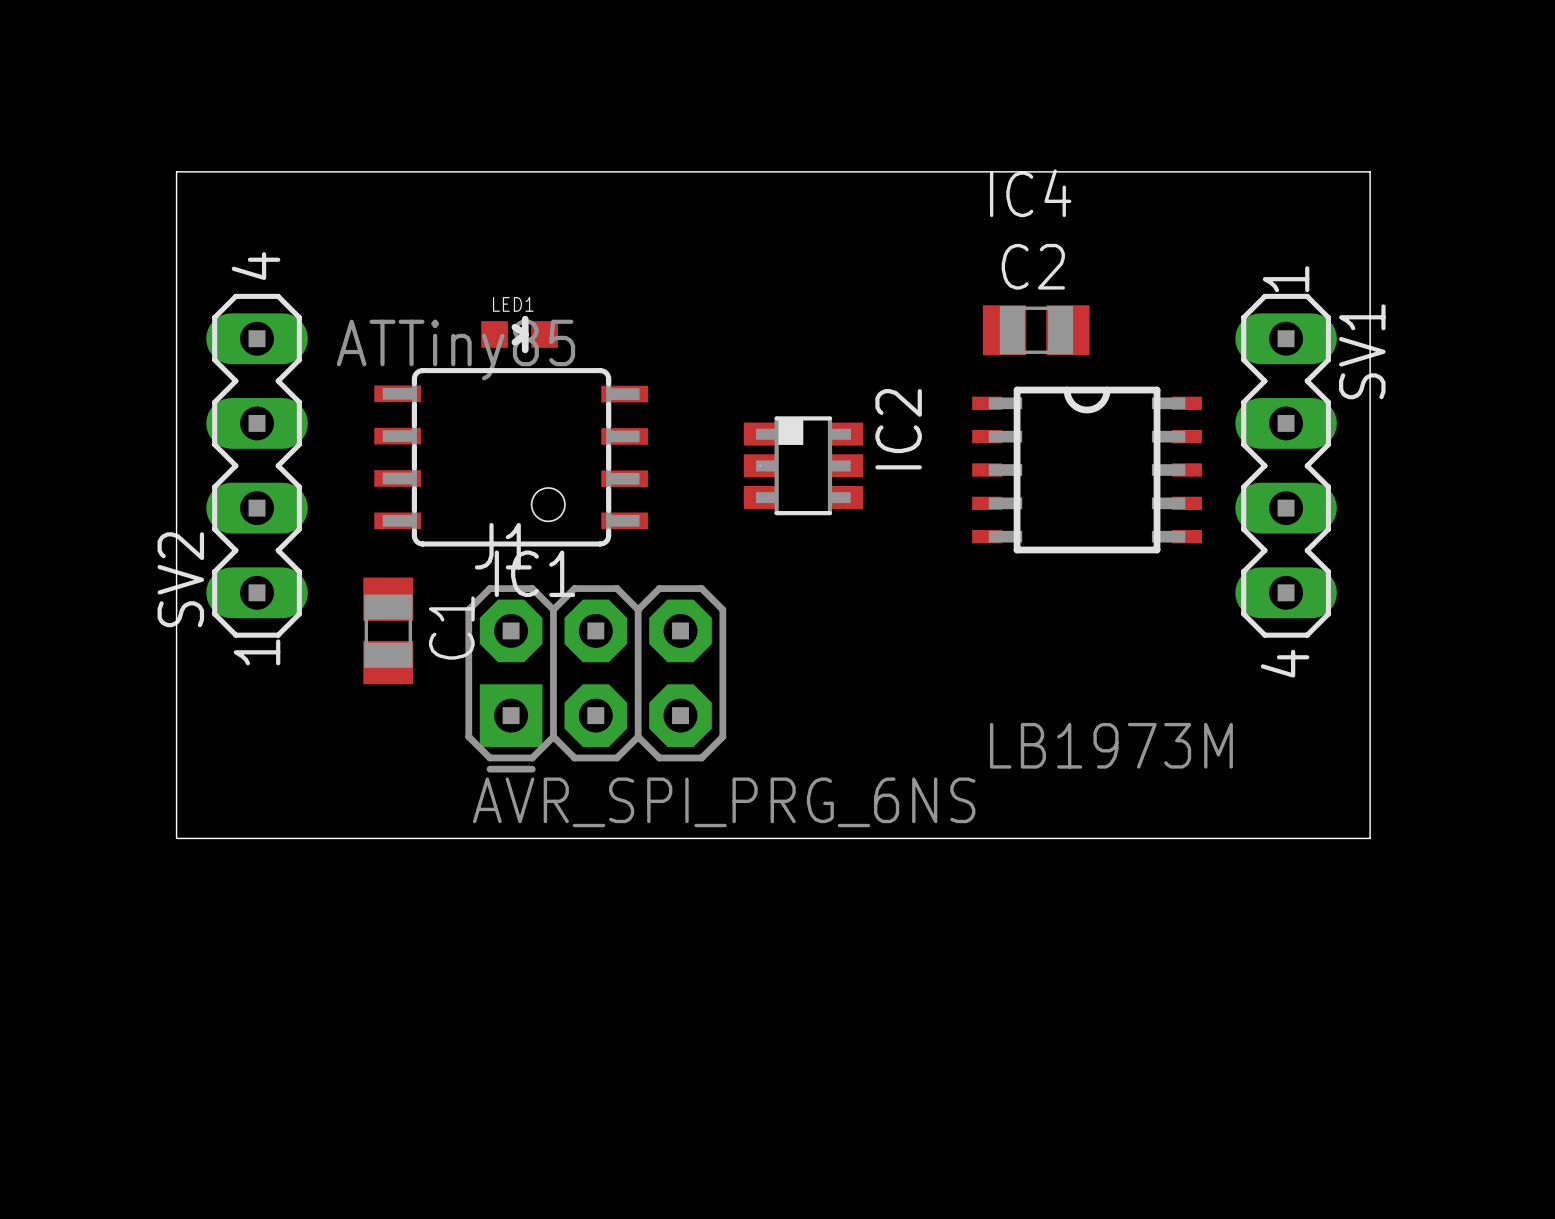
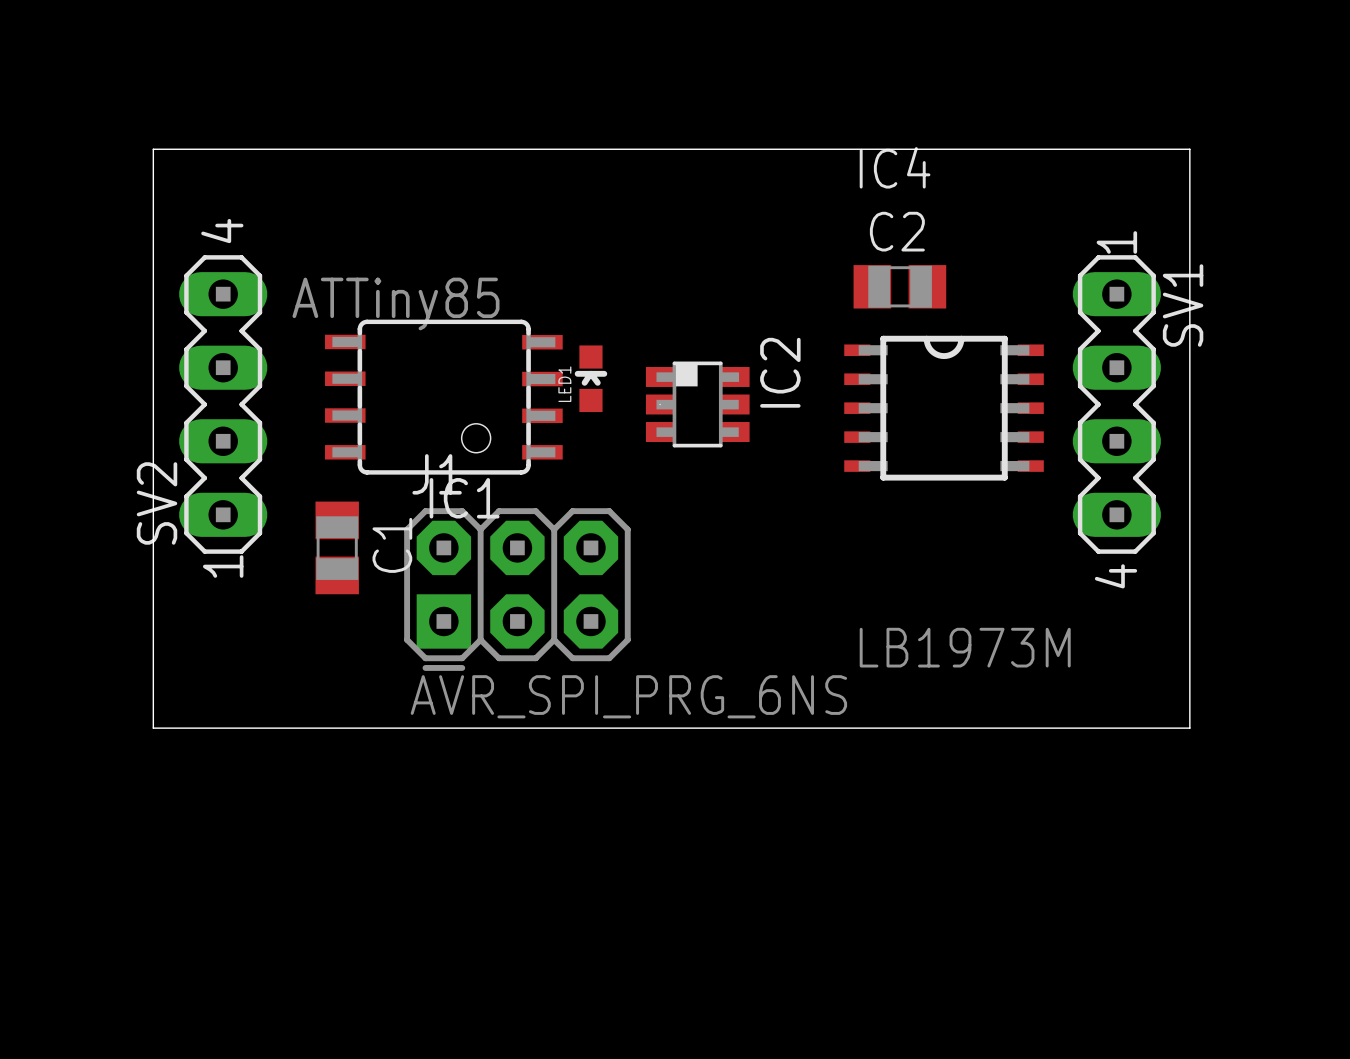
LED1 rotation: 0° (519, 334) -> 90° counterclockwise (590, 378)
LED1 position: (519, 334) -> (590, 378)

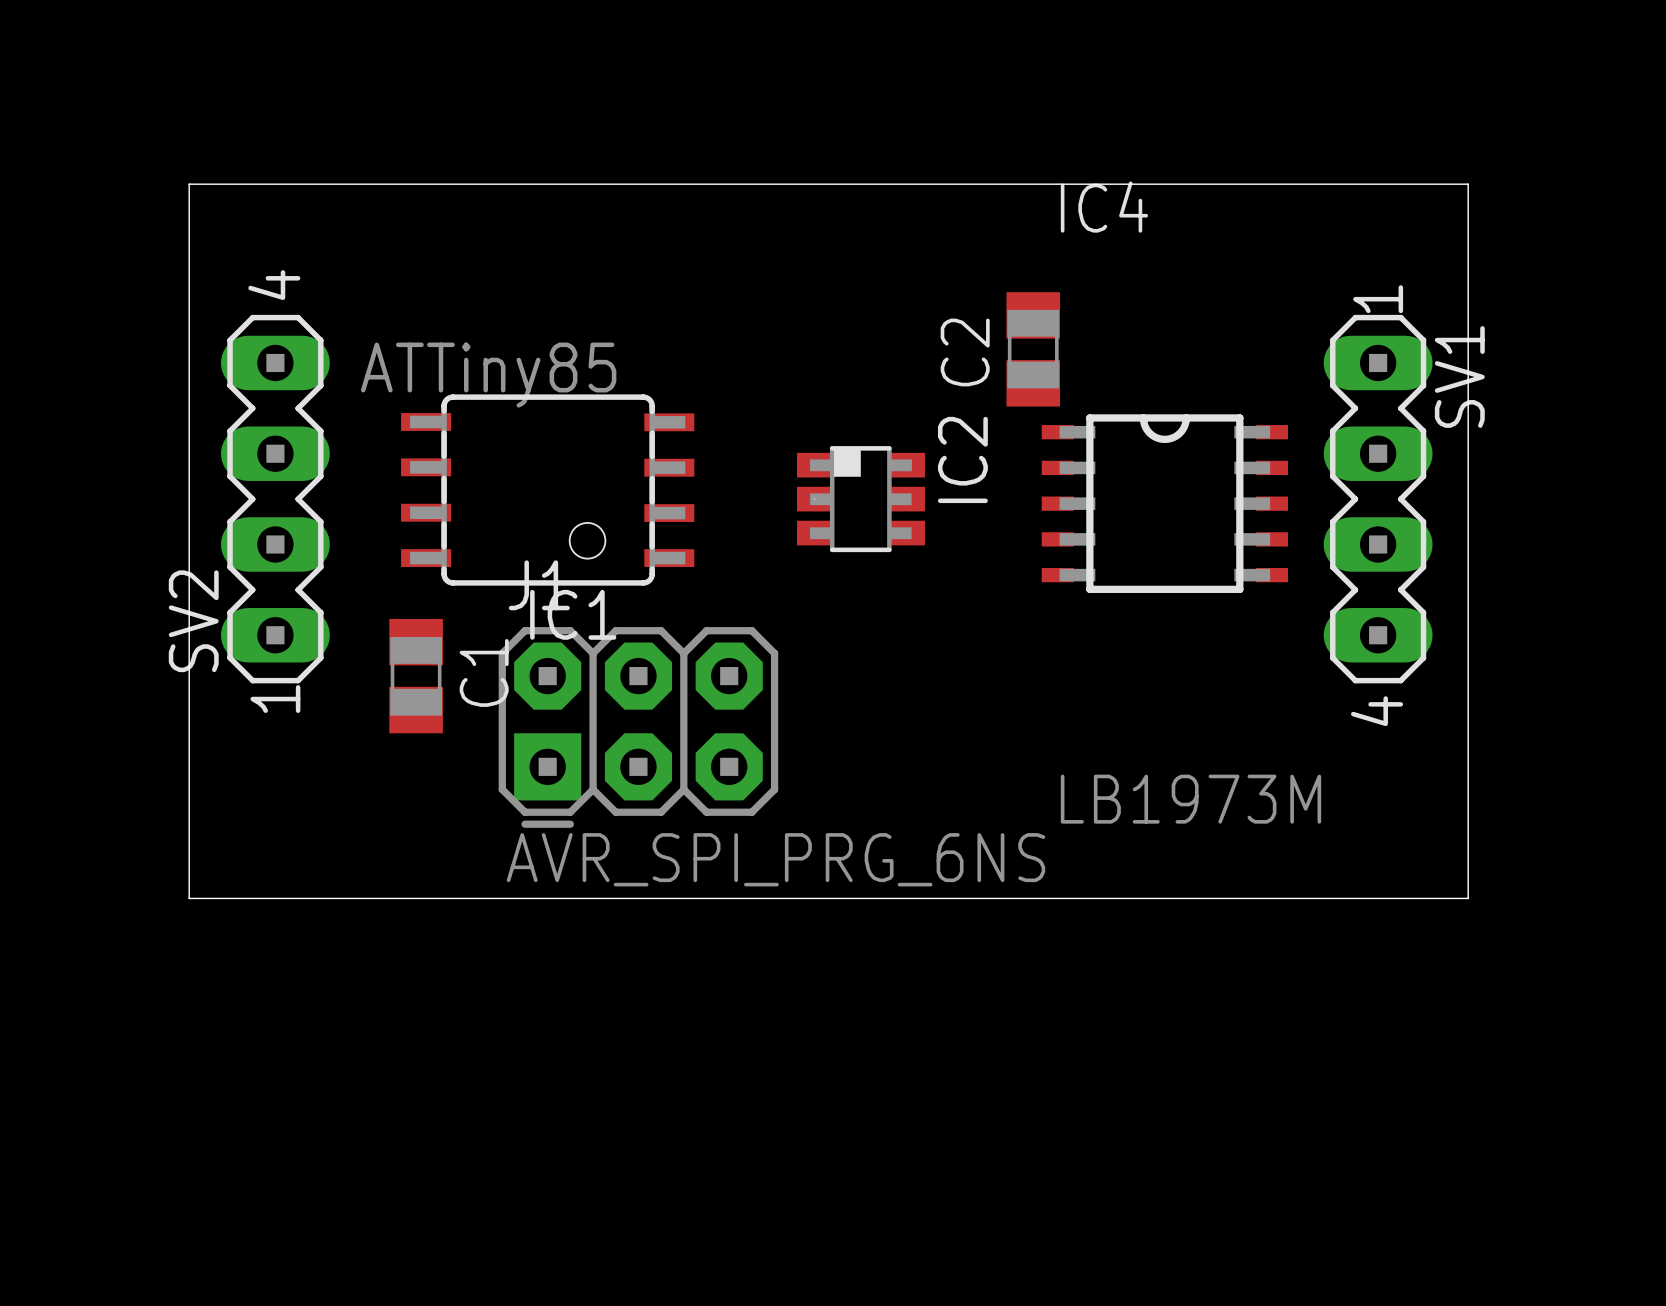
C2 name position: C2 (897, 231) -> C2 (965, 352)
C2 rotation: 0° (899, 286) -> 90° clockwise (1033, 349)
C2 position: (899, 286) -> (1033, 349)
LED1: (590, 378) -> none

